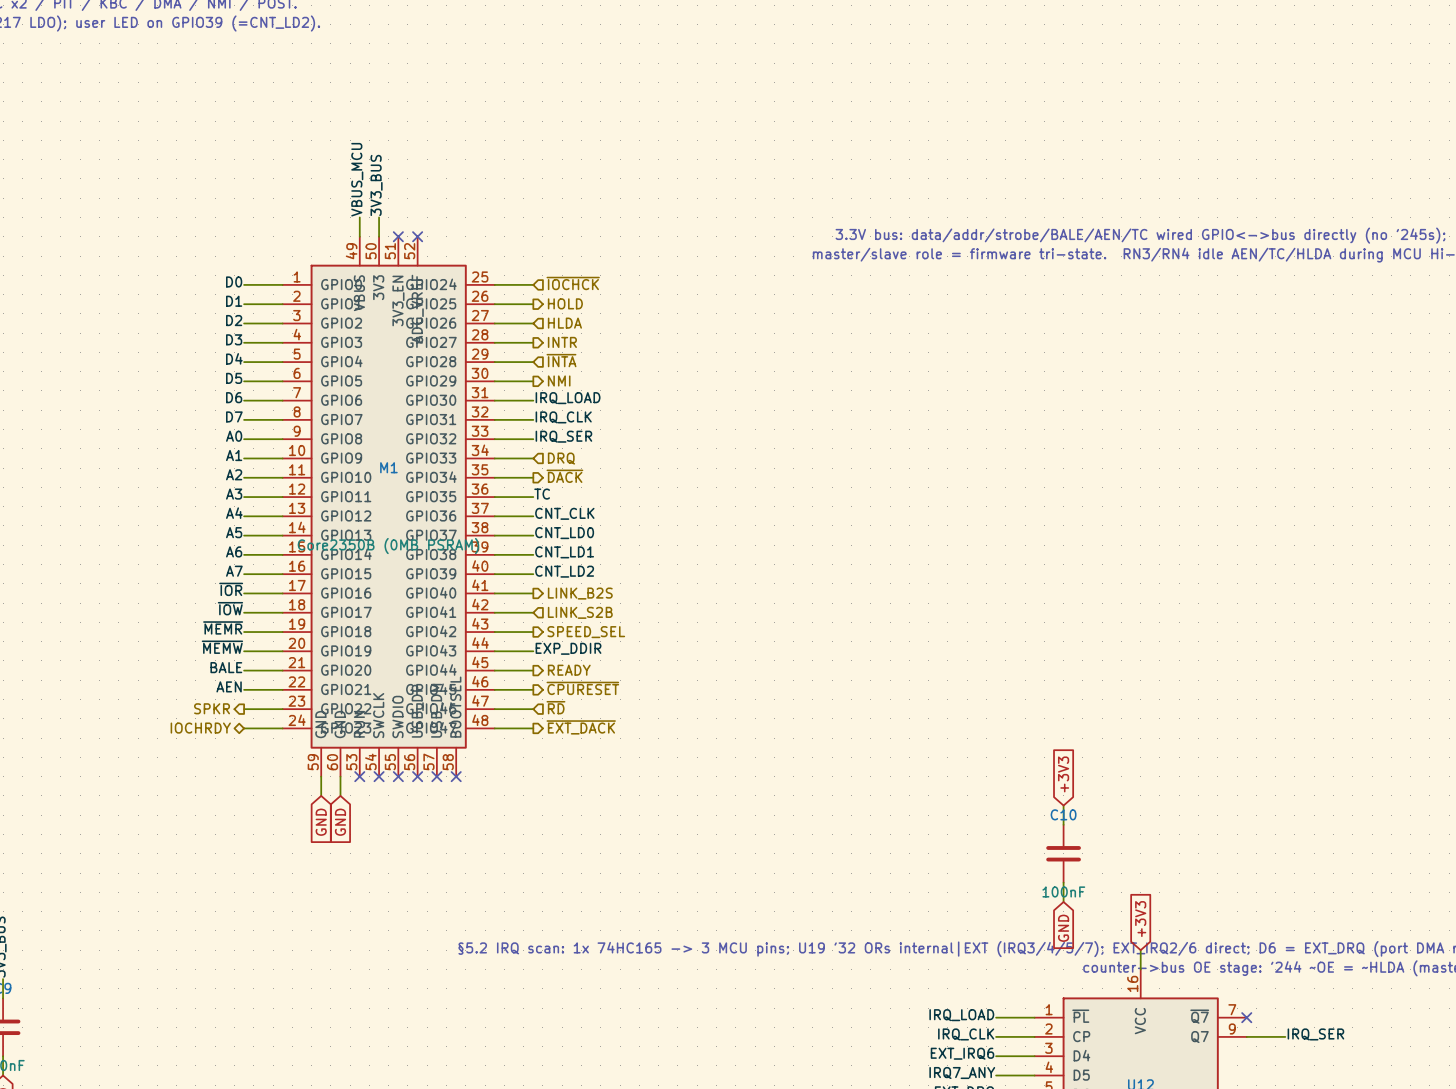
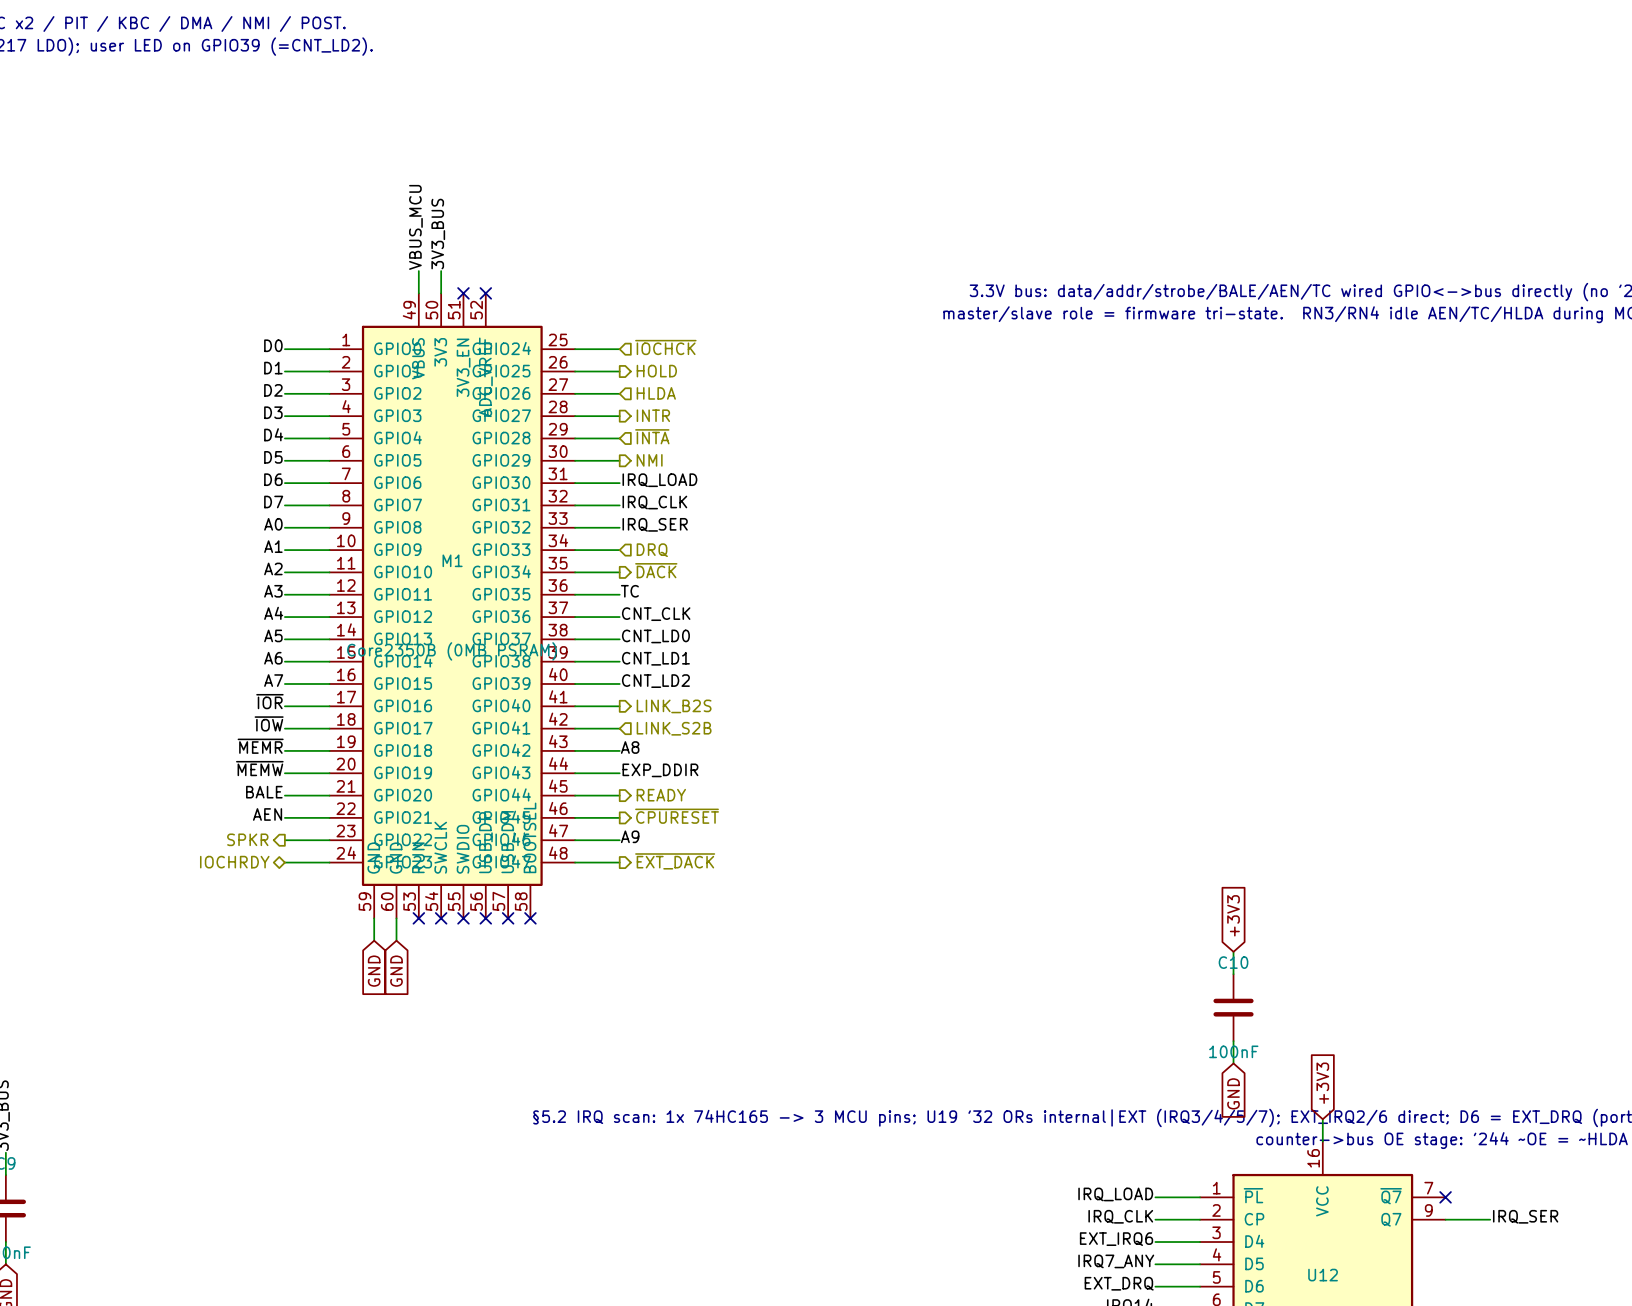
label: none -> A8 (630, 747)
hierarchical label: SPEED_SEL (586, 632) -> none
label: none -> A9 (630, 836)
hierarchical label: ~{RD} (555, 707) -> none

